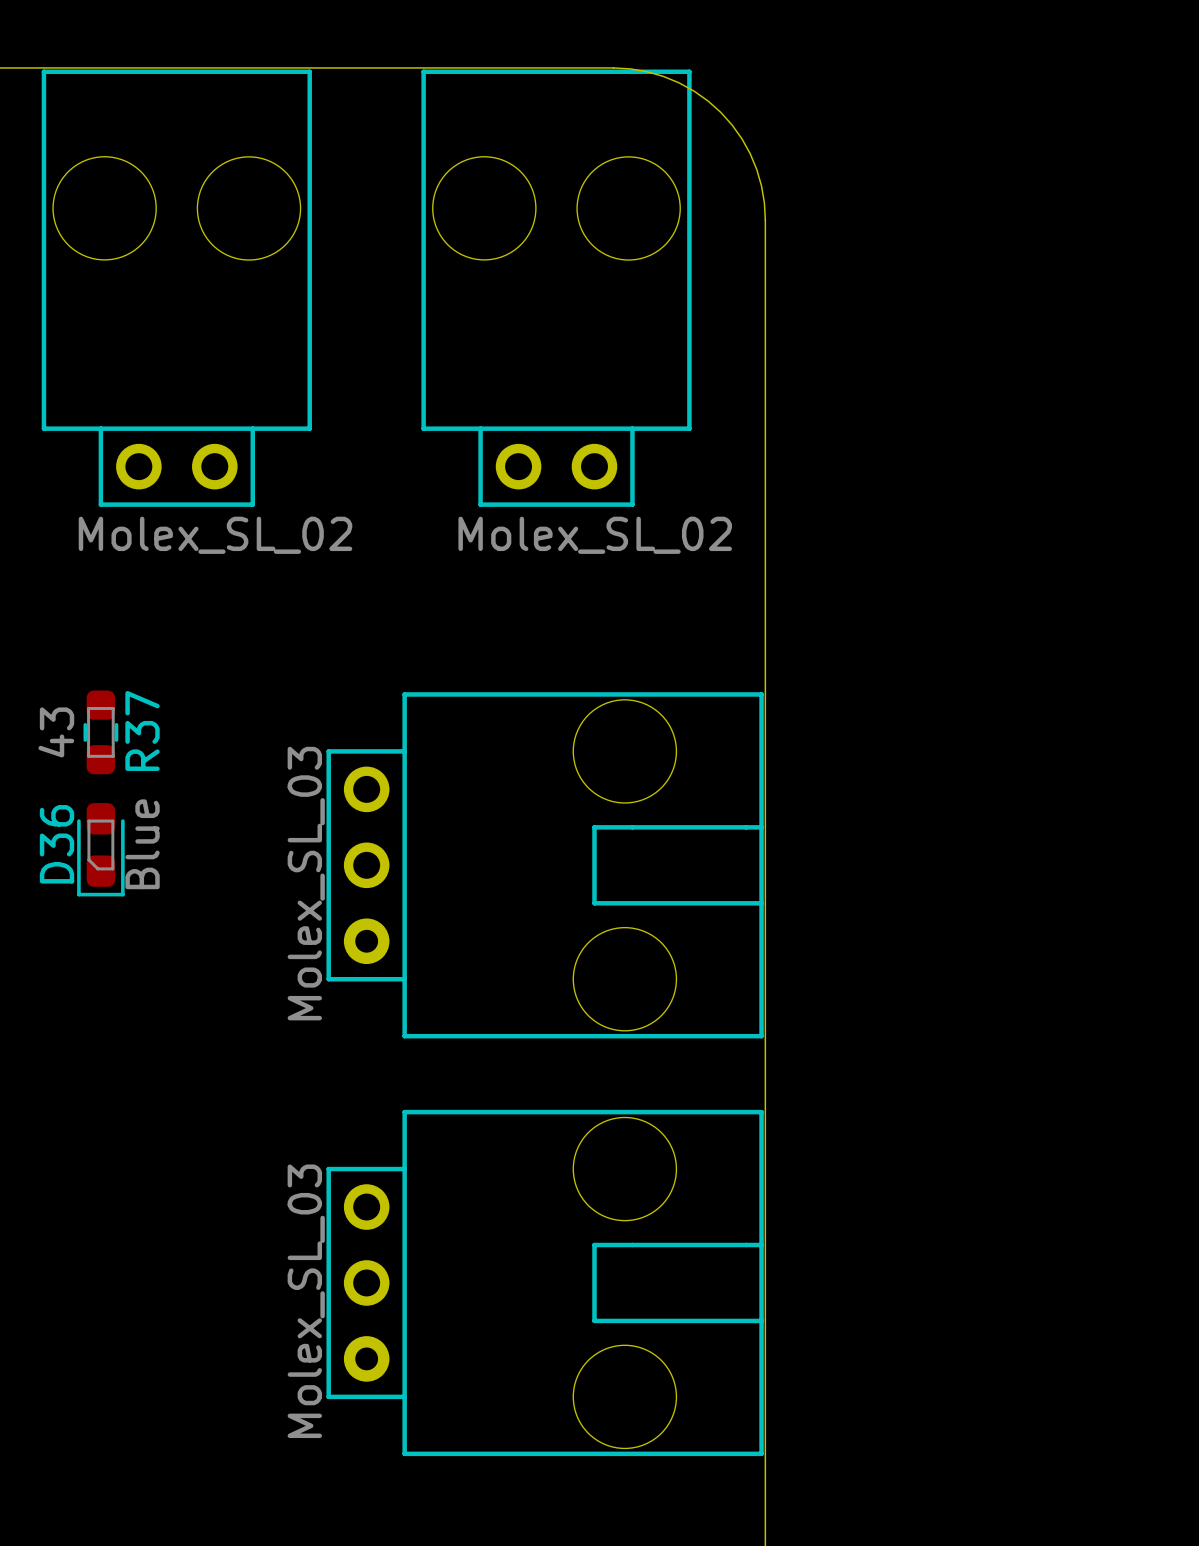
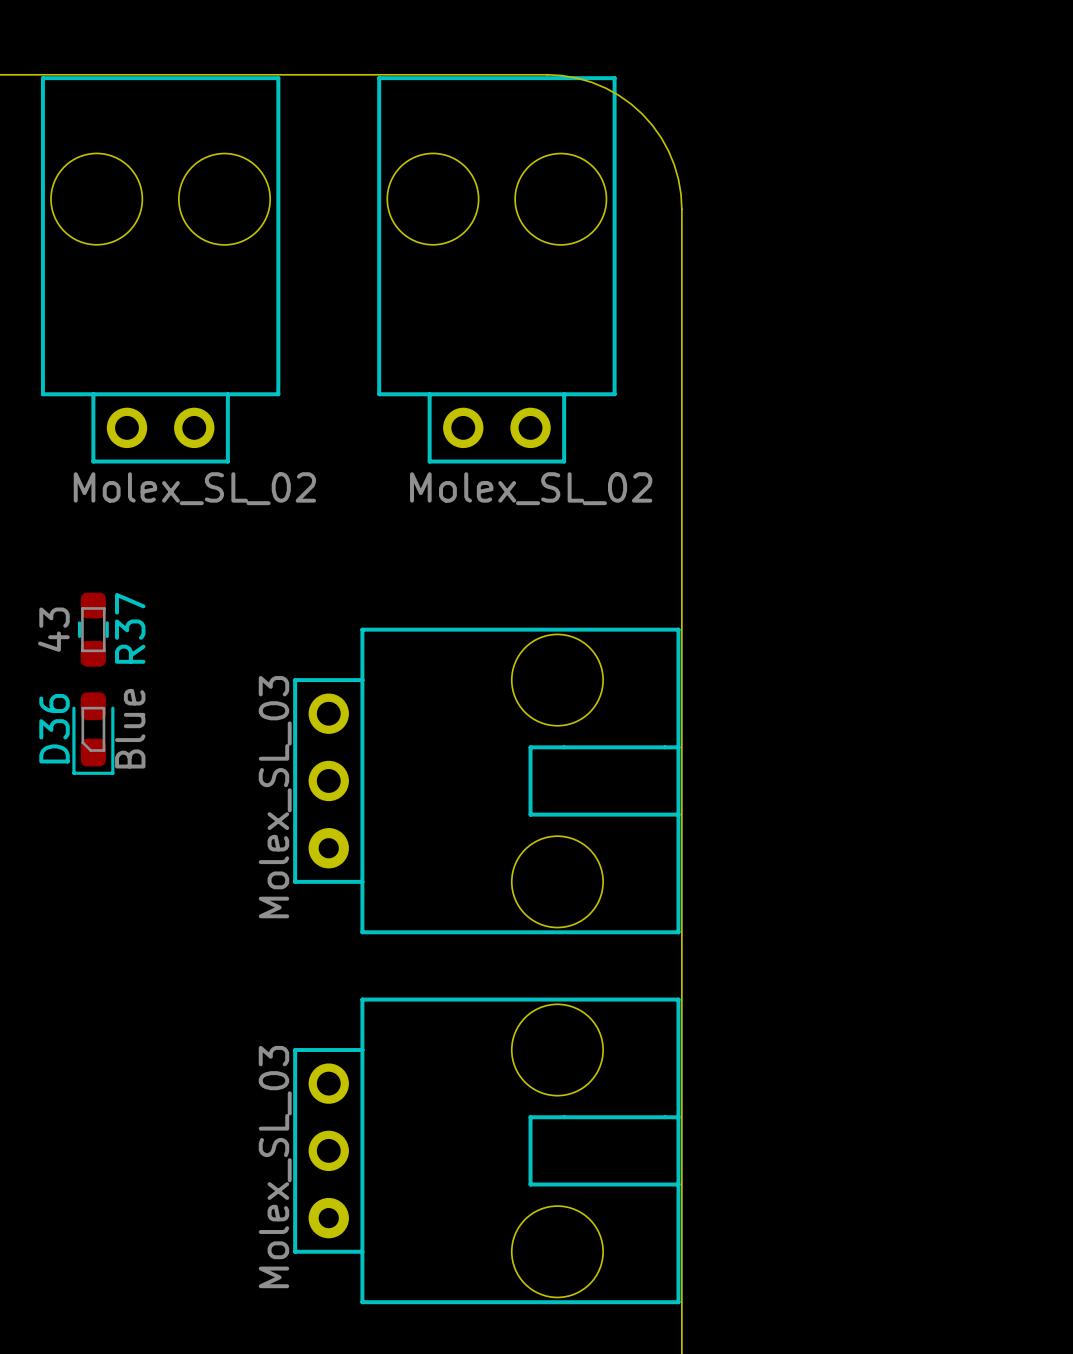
R37 position: (100, 732) -> (93, 629)
D36 position: (100, 849) -> (93, 733)

